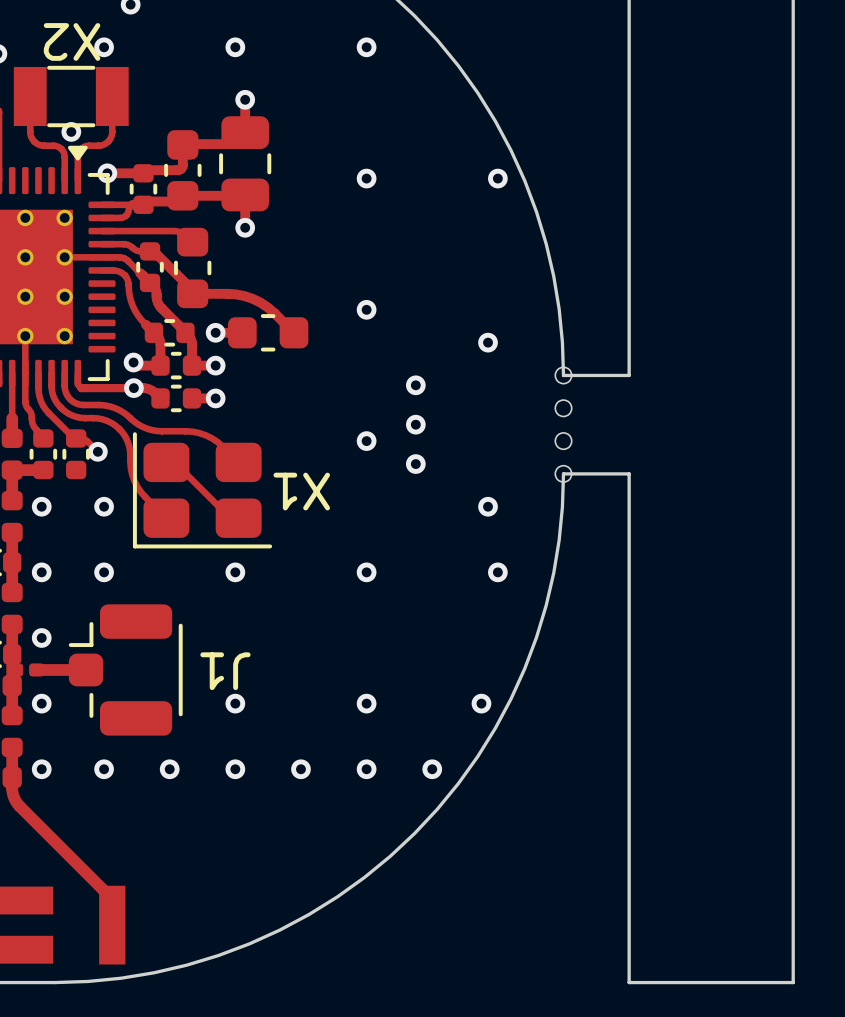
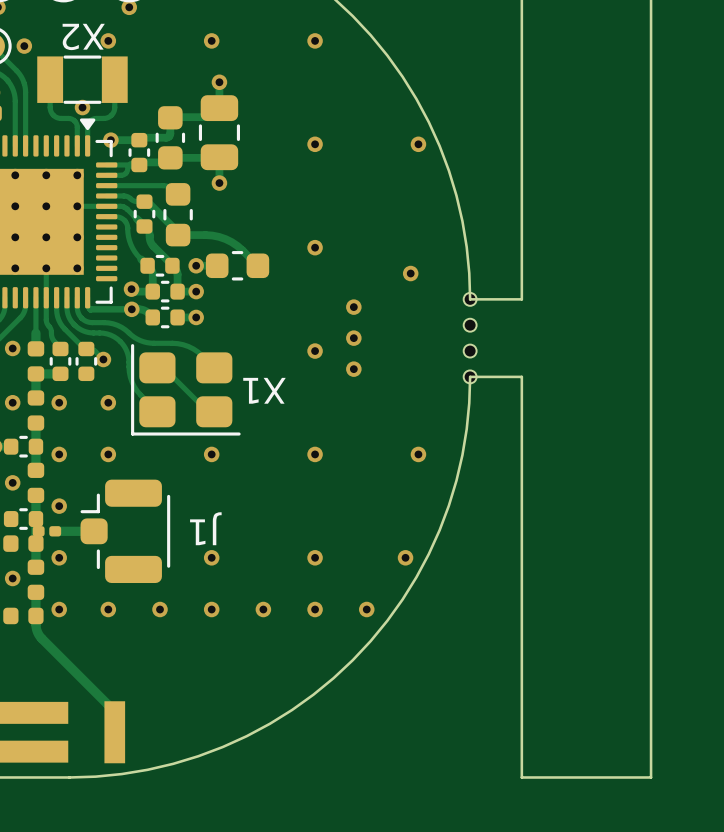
via: (488, 506) -> none

